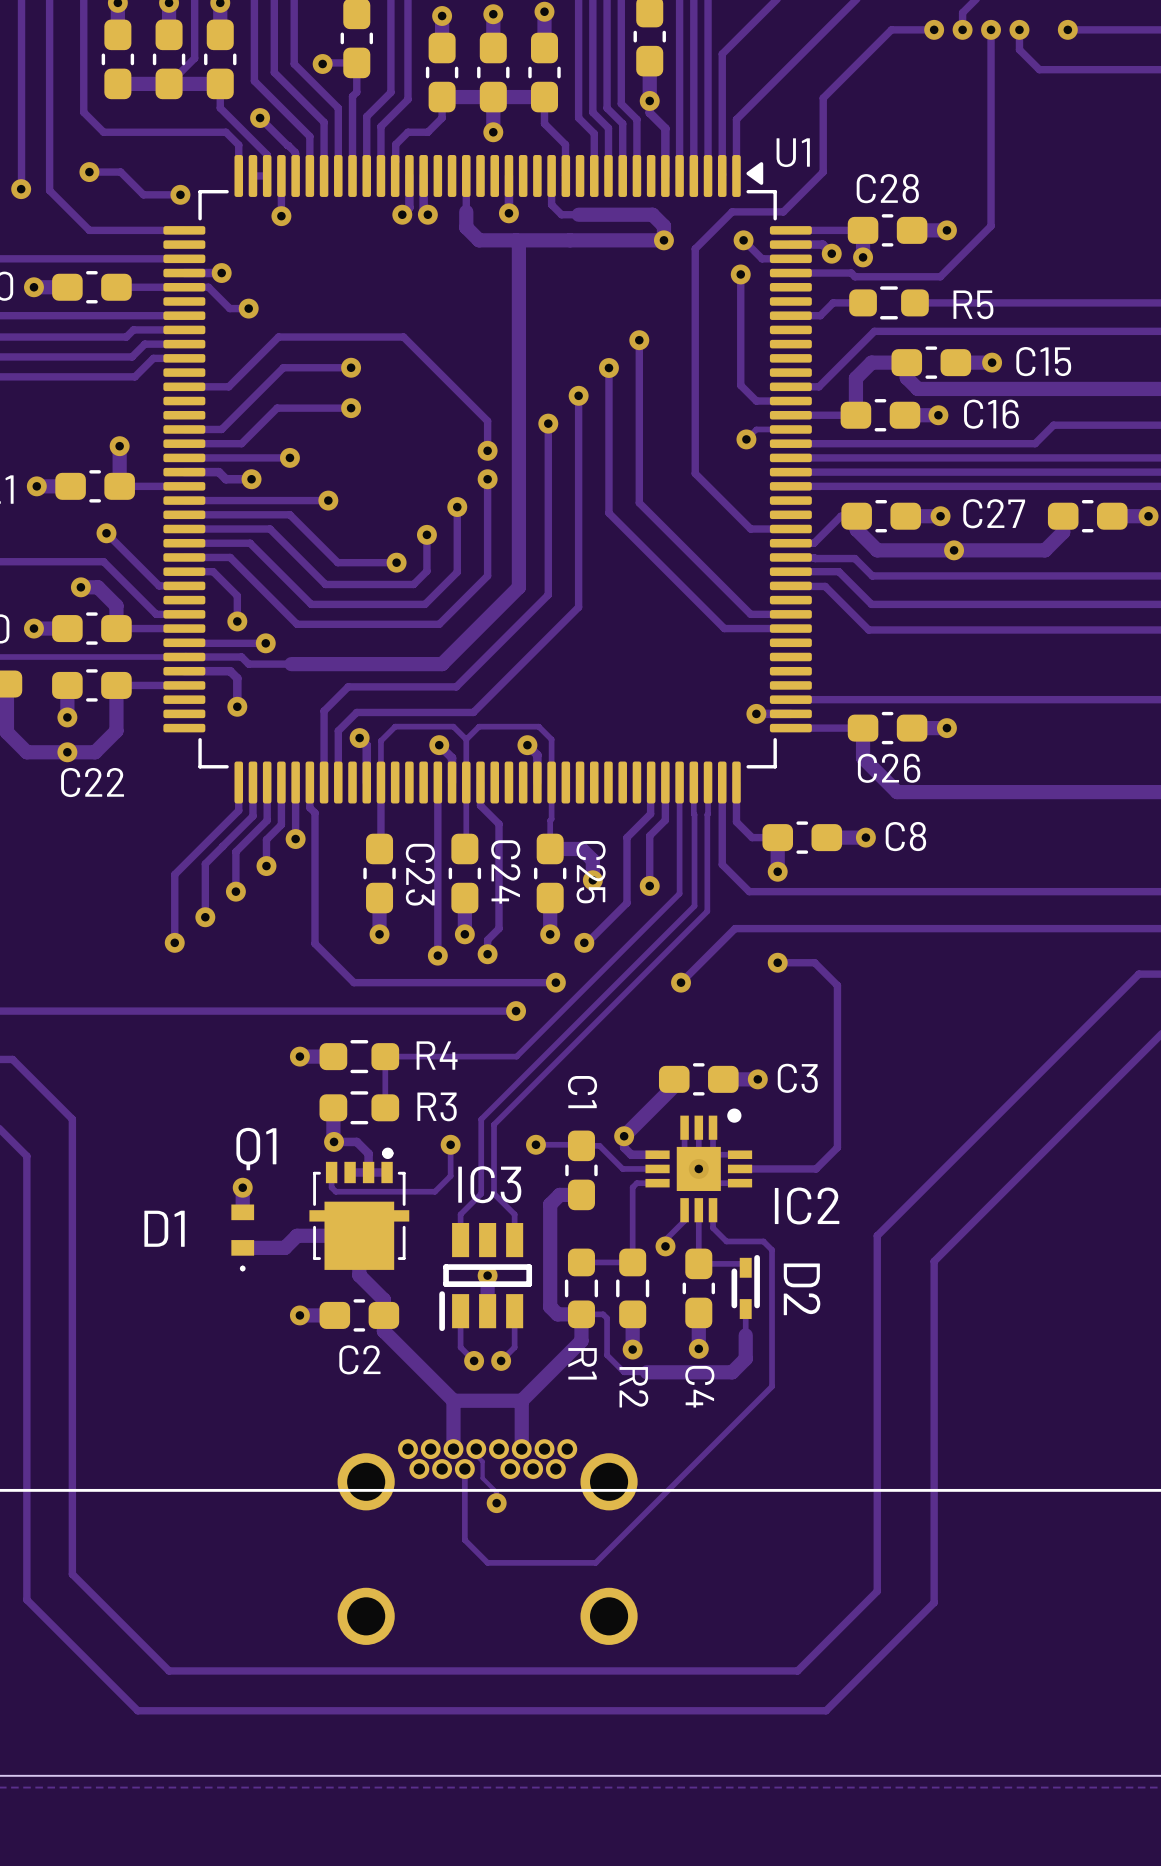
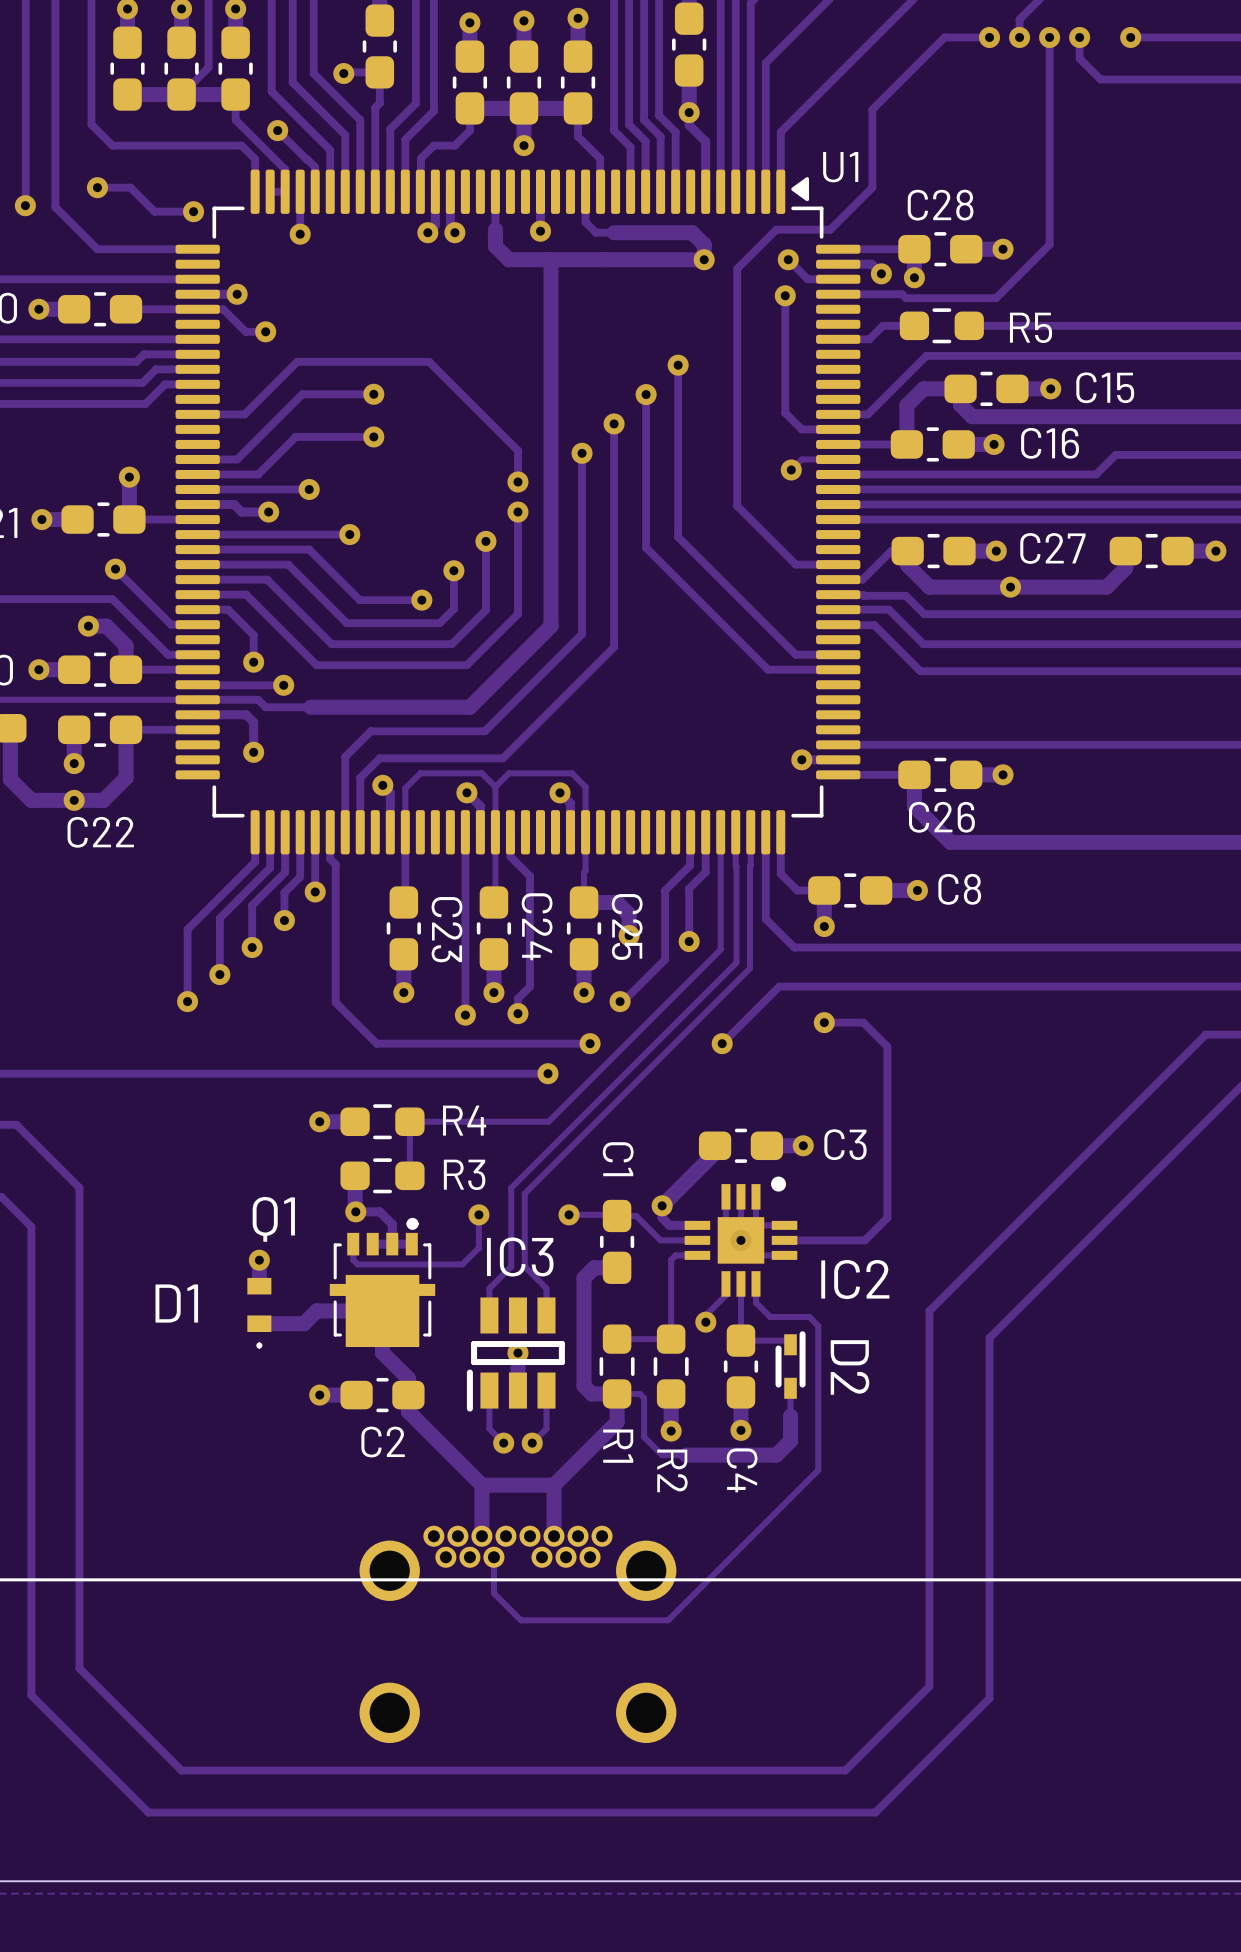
track: (476, 1449) (476, 1455) (482, 1461) (482, 1478) (496, 1492) (496, 1503) -> none
track: (464, 1503) (464, 1540) (487, 1562) (595, 1562) (629, 1528) -> (493, 1593) (520, 1620) (668, 1620)
via: (496, 1503) -> none

